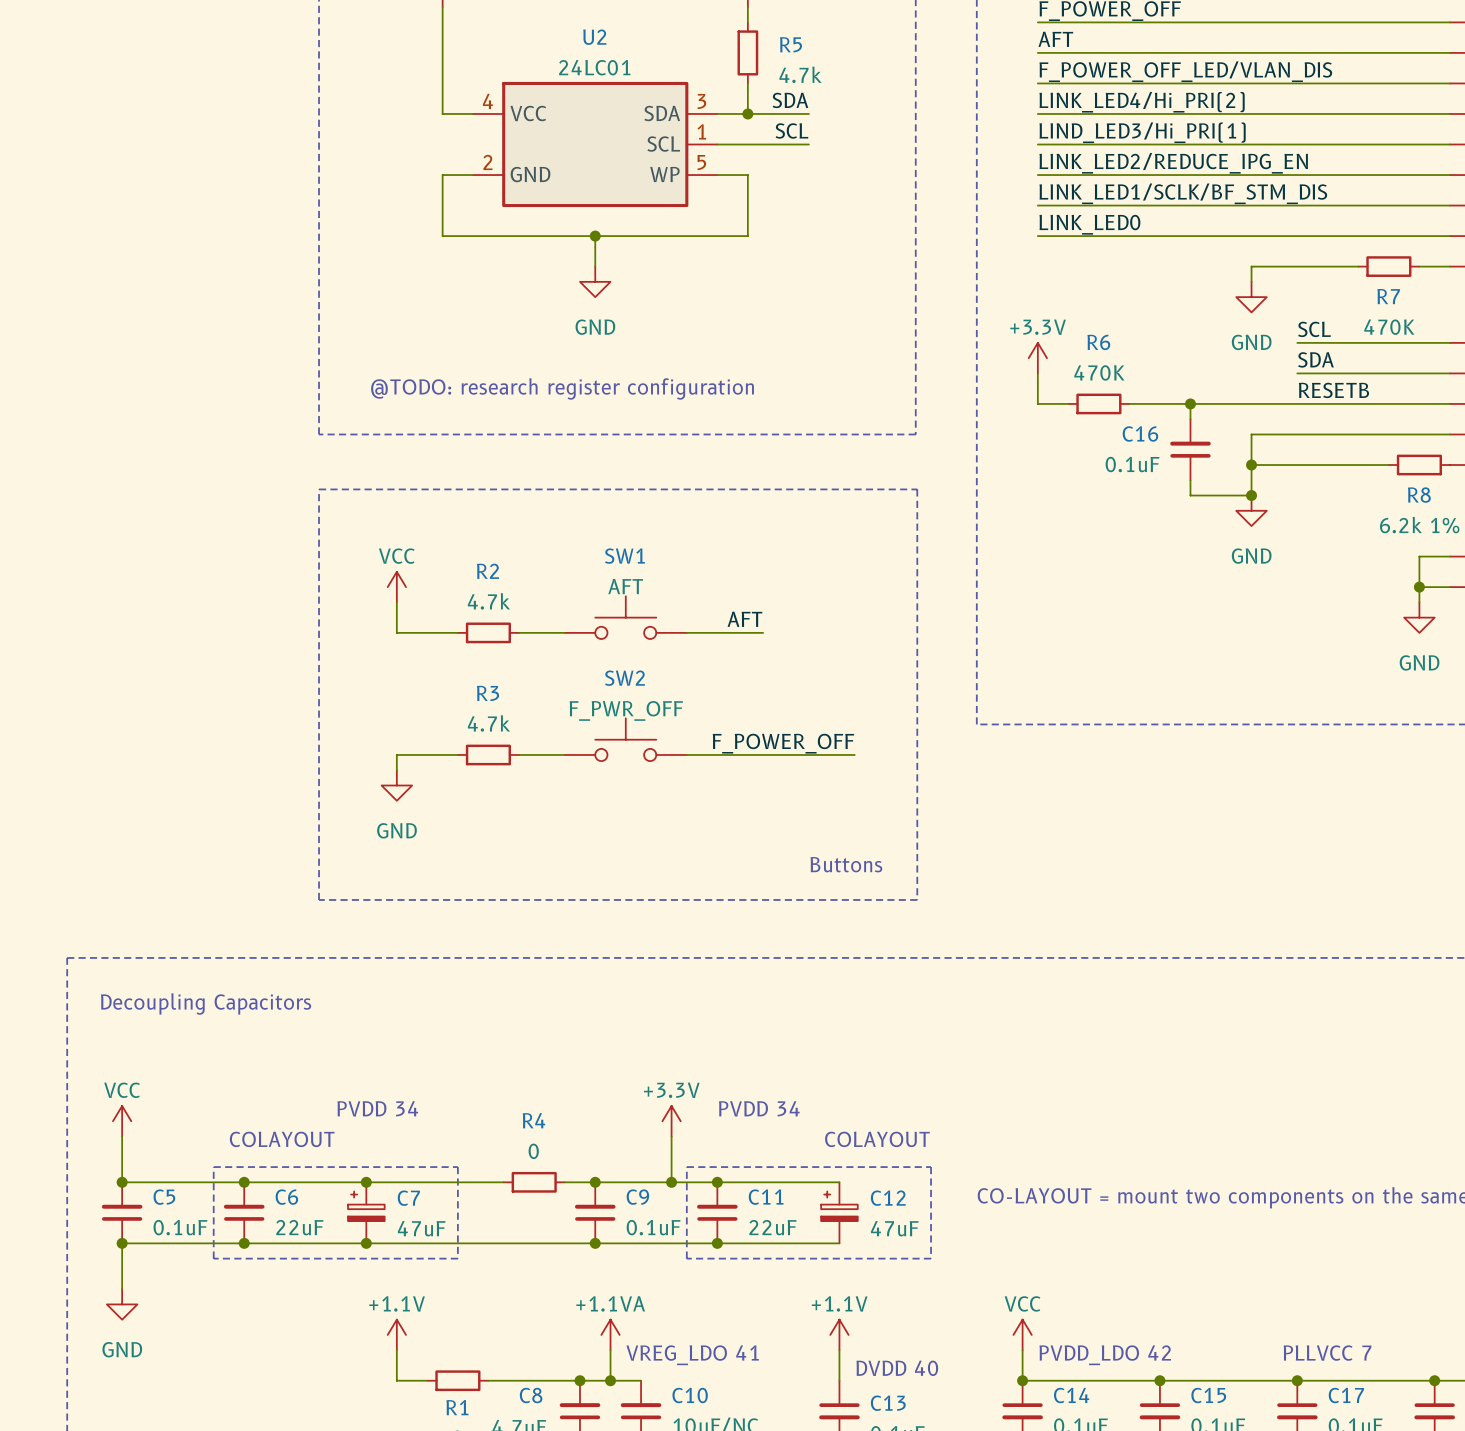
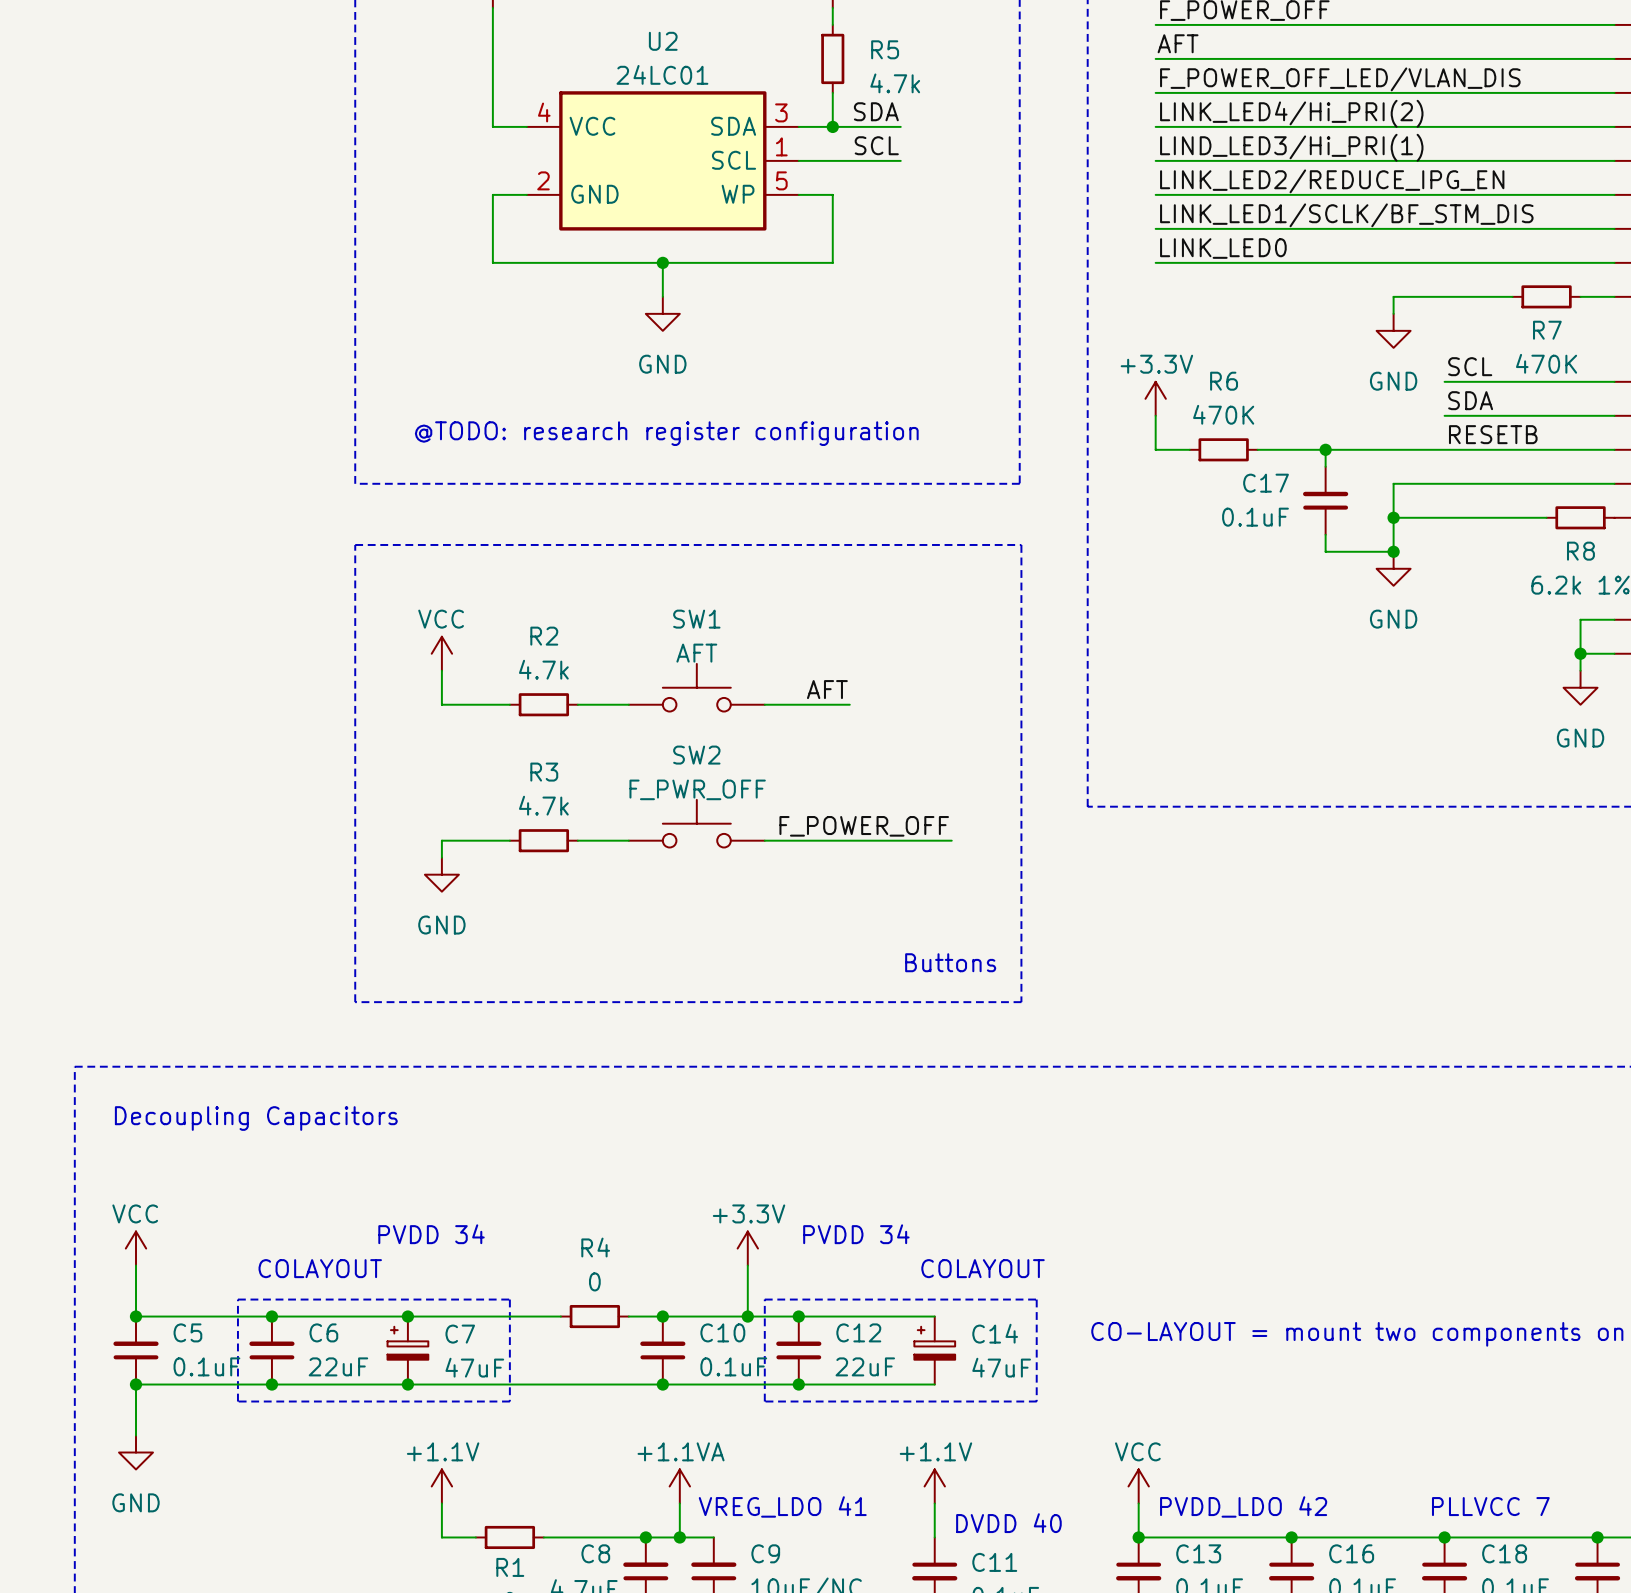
C16 name: C16 (1140, 433) -> C17 (1266, 483)
C9 name: C9 (637, 1197) -> C10 (722, 1332)
C11 name: C11 (766, 1197) -> C12 (858, 1332)
C12 name: C12 (888, 1198) -> C14 (995, 1333)
C10 name: C10 (690, 1395) -> C9 (765, 1553)
C14 name: C14 (1071, 1395) -> C13 (1198, 1553)
C15 name: C15 (1208, 1395) -> C16 (1351, 1553)
C17 name: C17 (1346, 1395) -> C18 (1504, 1553)
C13 name: C13 (888, 1403) -> C11 (994, 1562)

